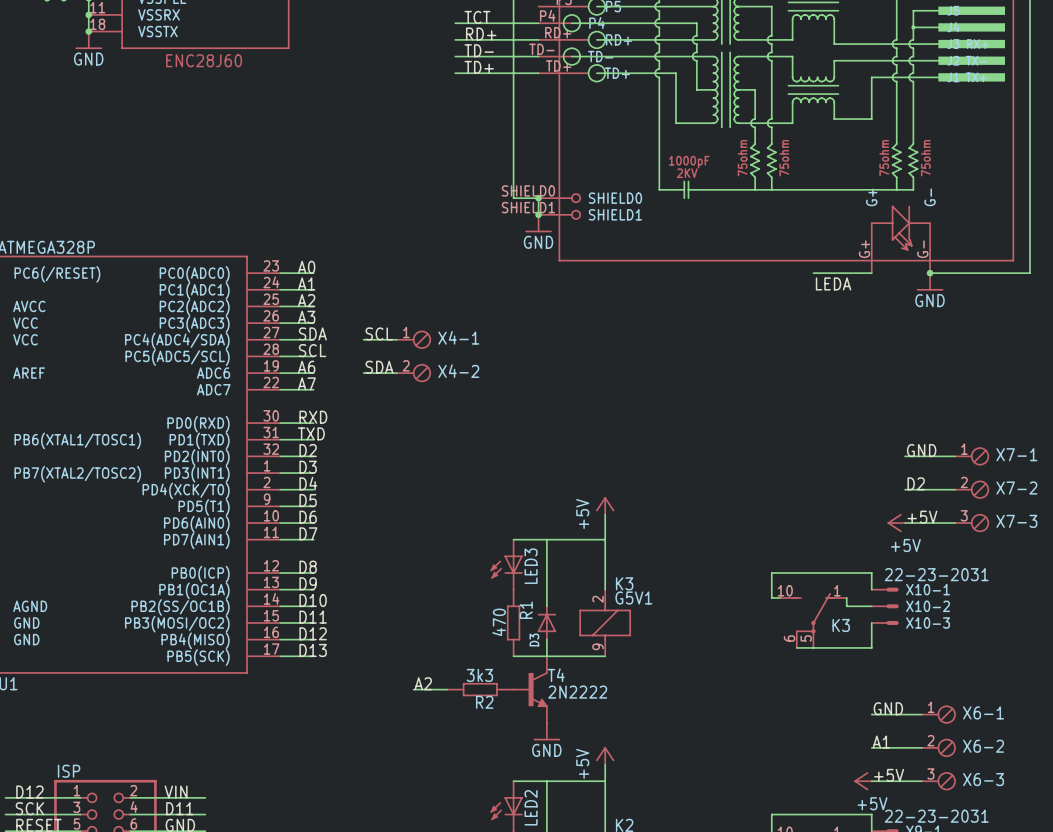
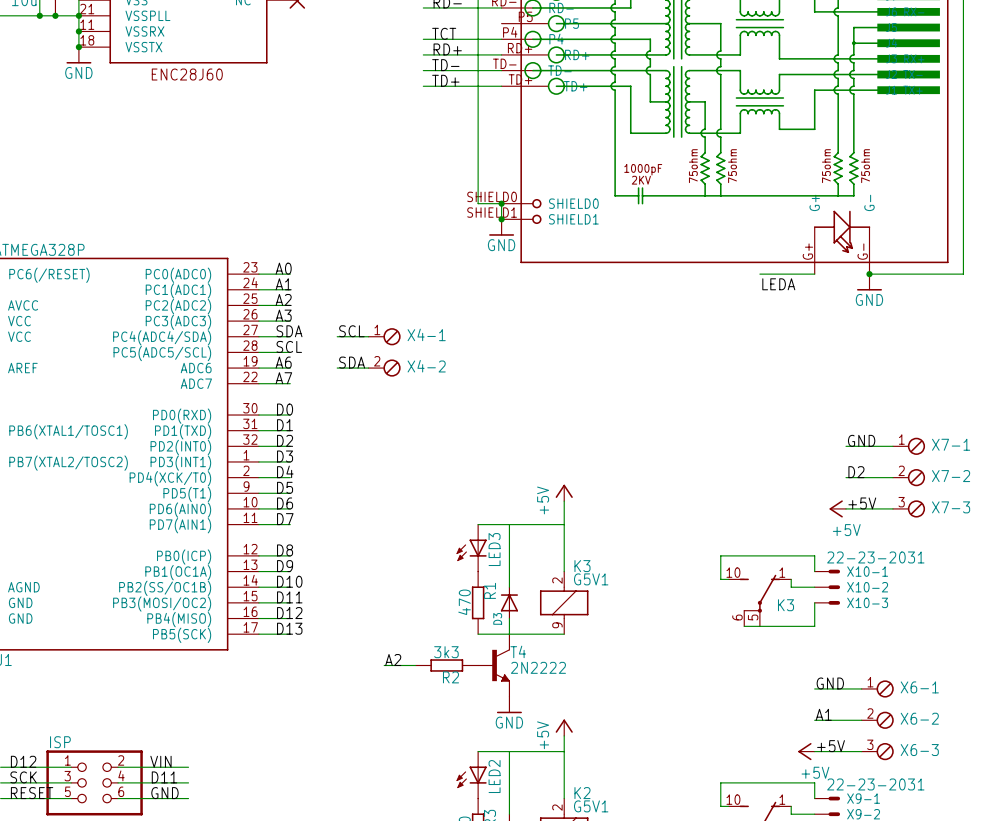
label: RXD (313, 417) -> D0 (285, 409)
label: TXD (311, 433) -> D1 (285, 425)

